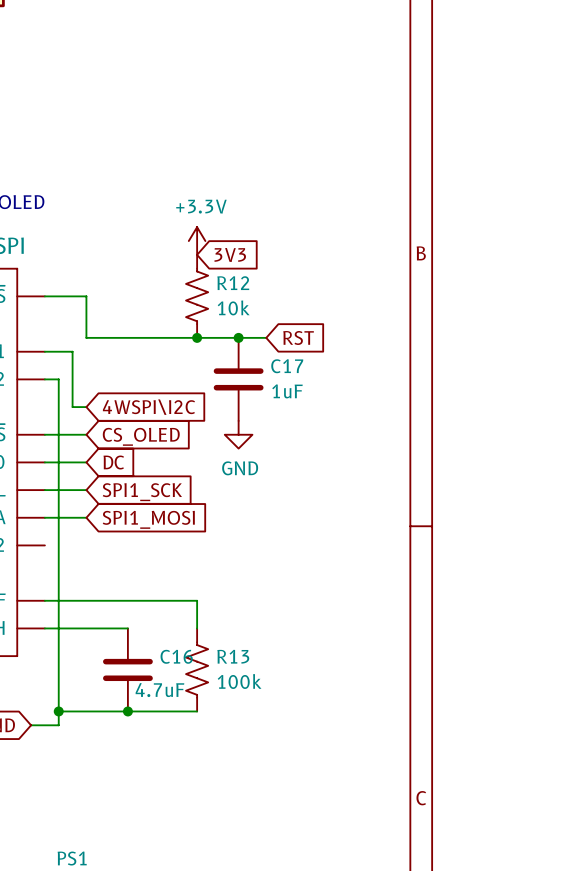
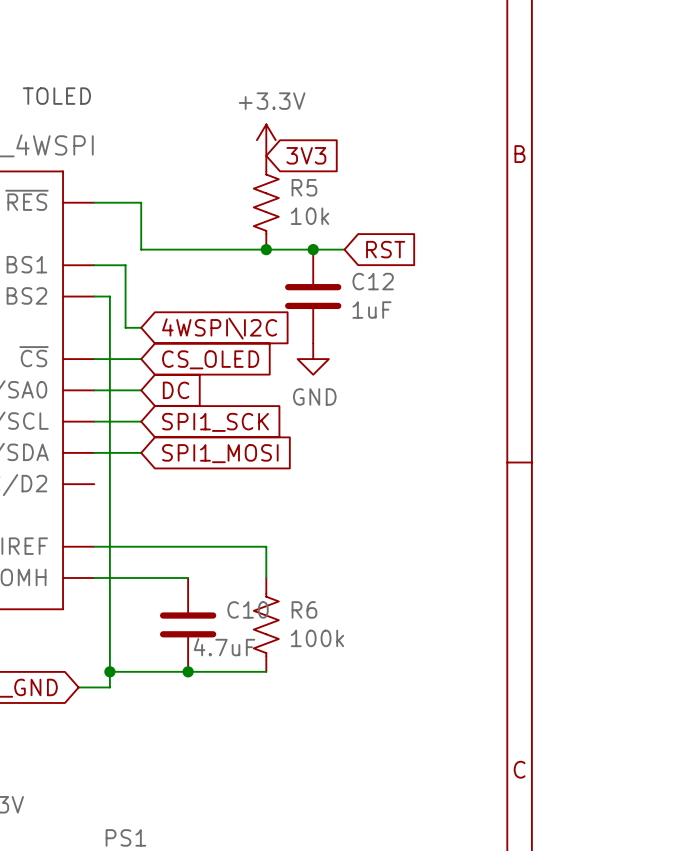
R12 name: R12 (233, 283) -> R5 (304, 187)
C17 name: C17 (287, 366) -> C12 (373, 281)
C16 name: C16 (176, 656) -> C10 (248, 609)
R13 name: R13 (233, 656) -> R6 (304, 609)

